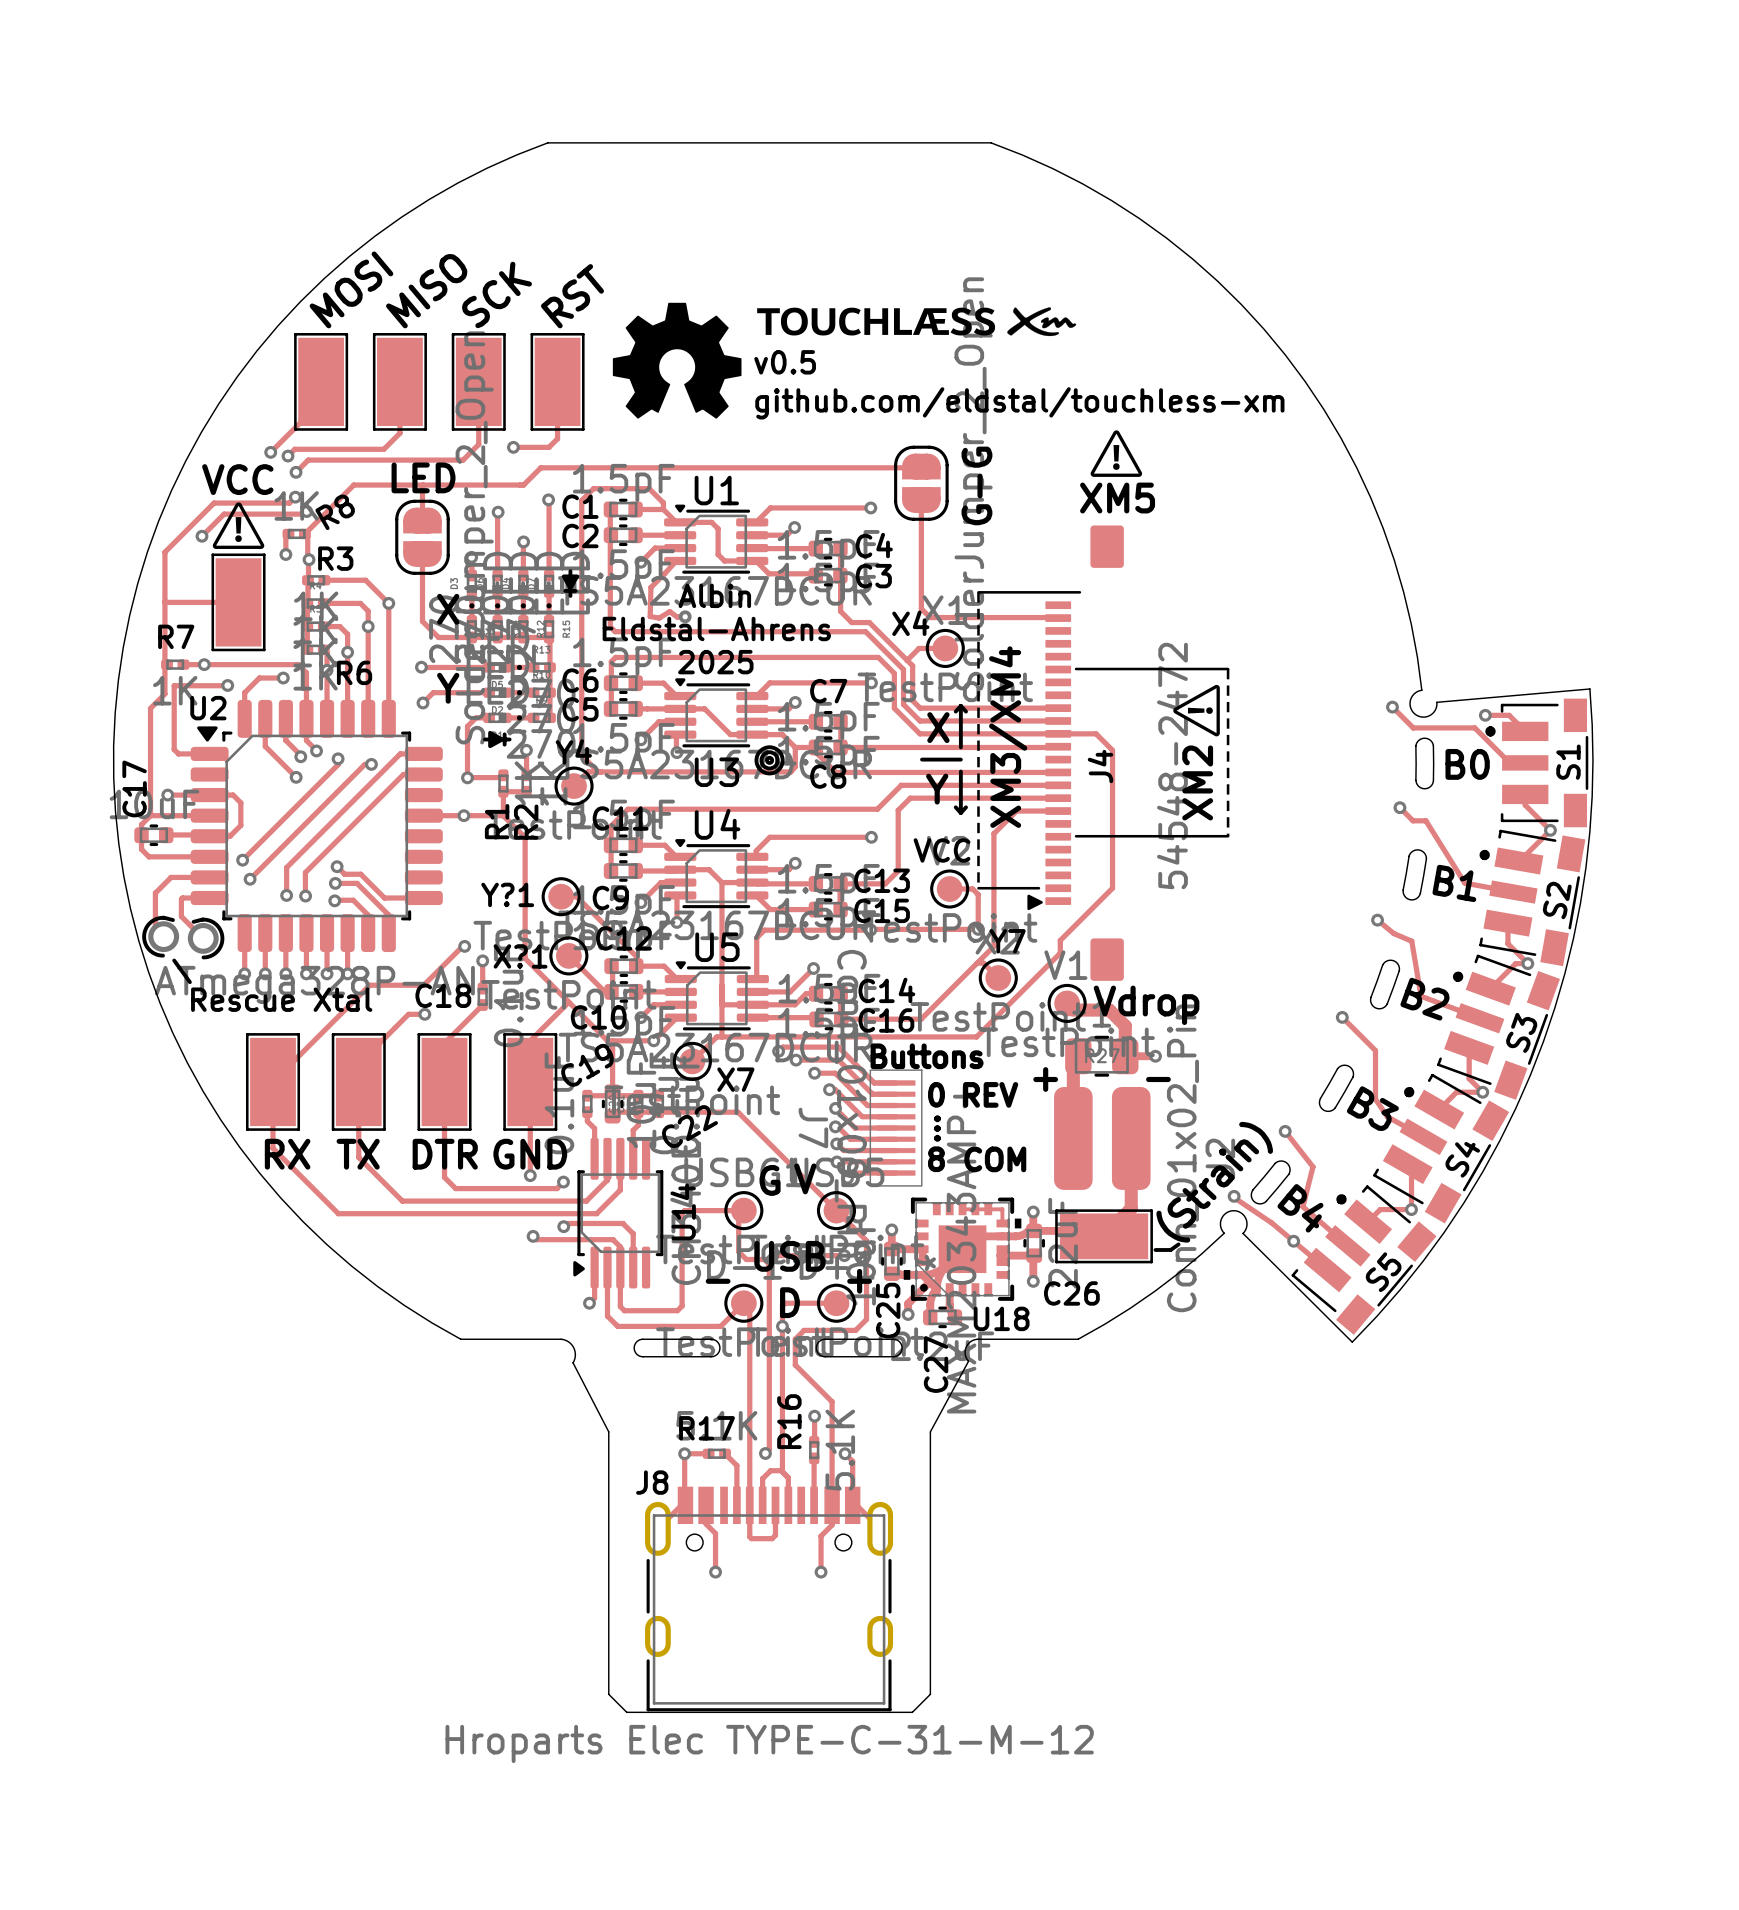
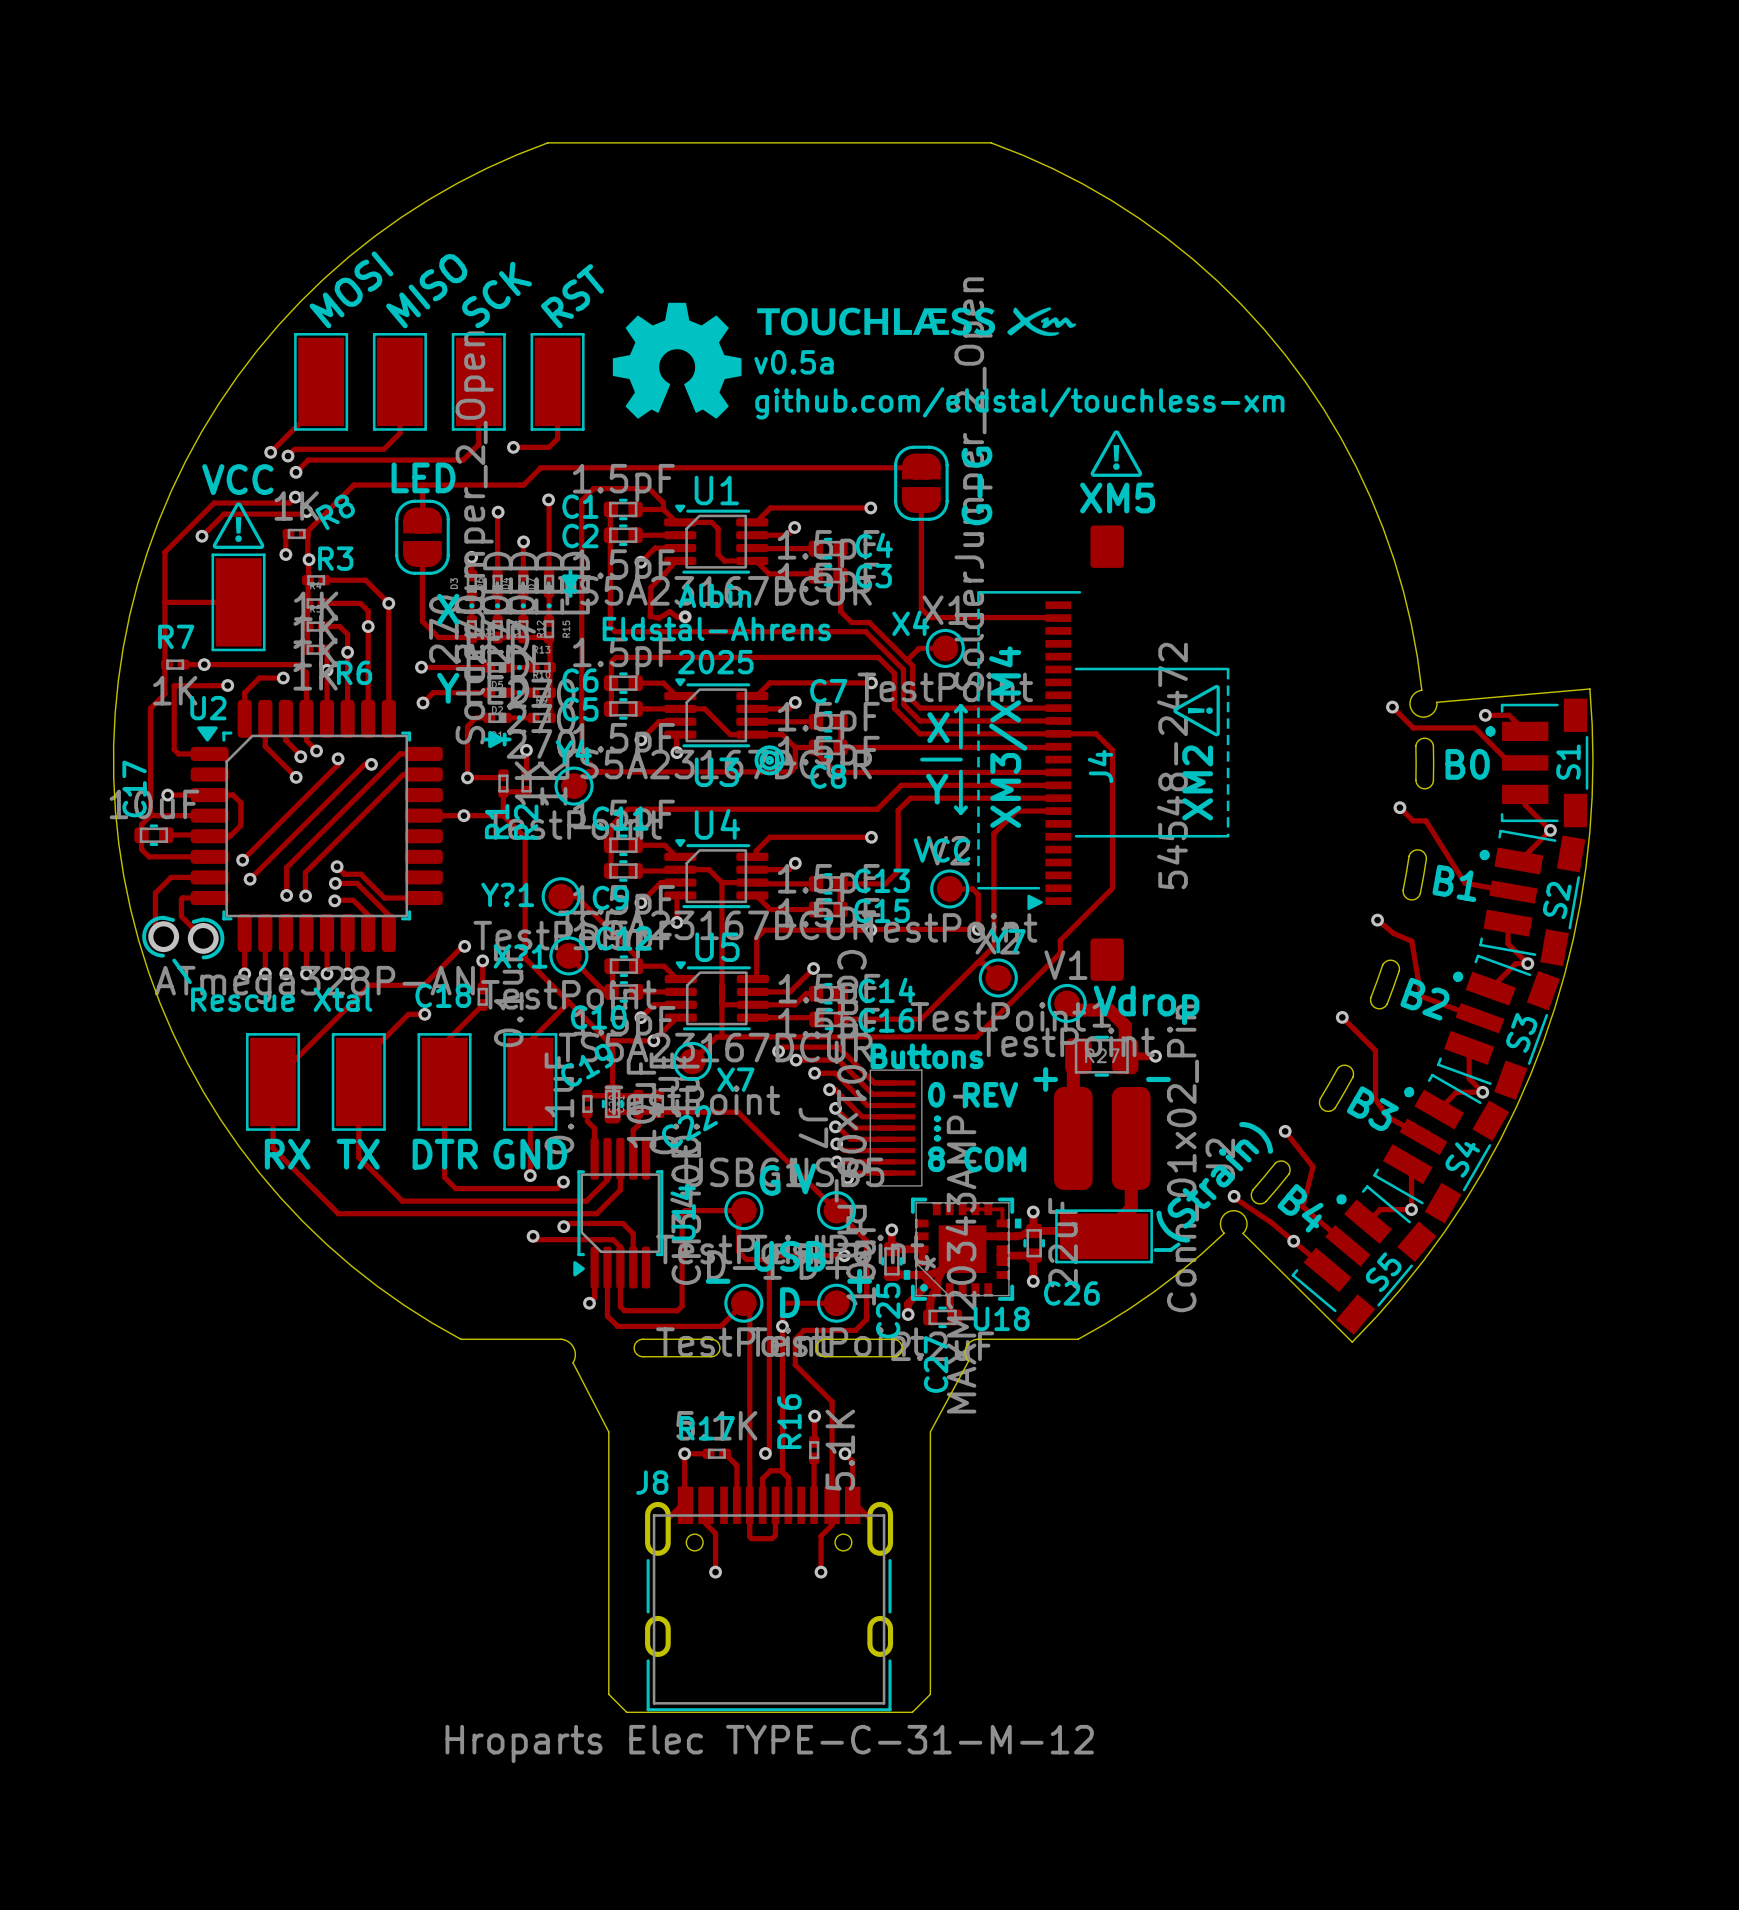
text: v0.5 (785, 362) -> v0.5a (793, 362)

